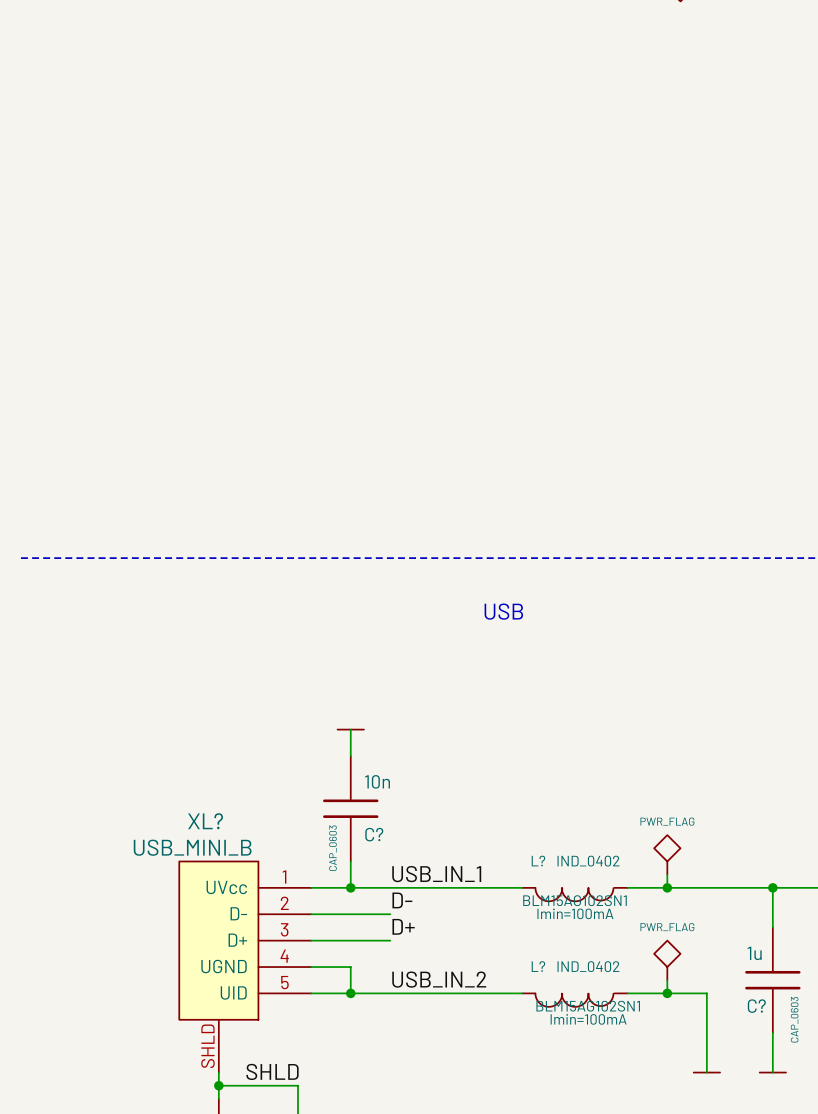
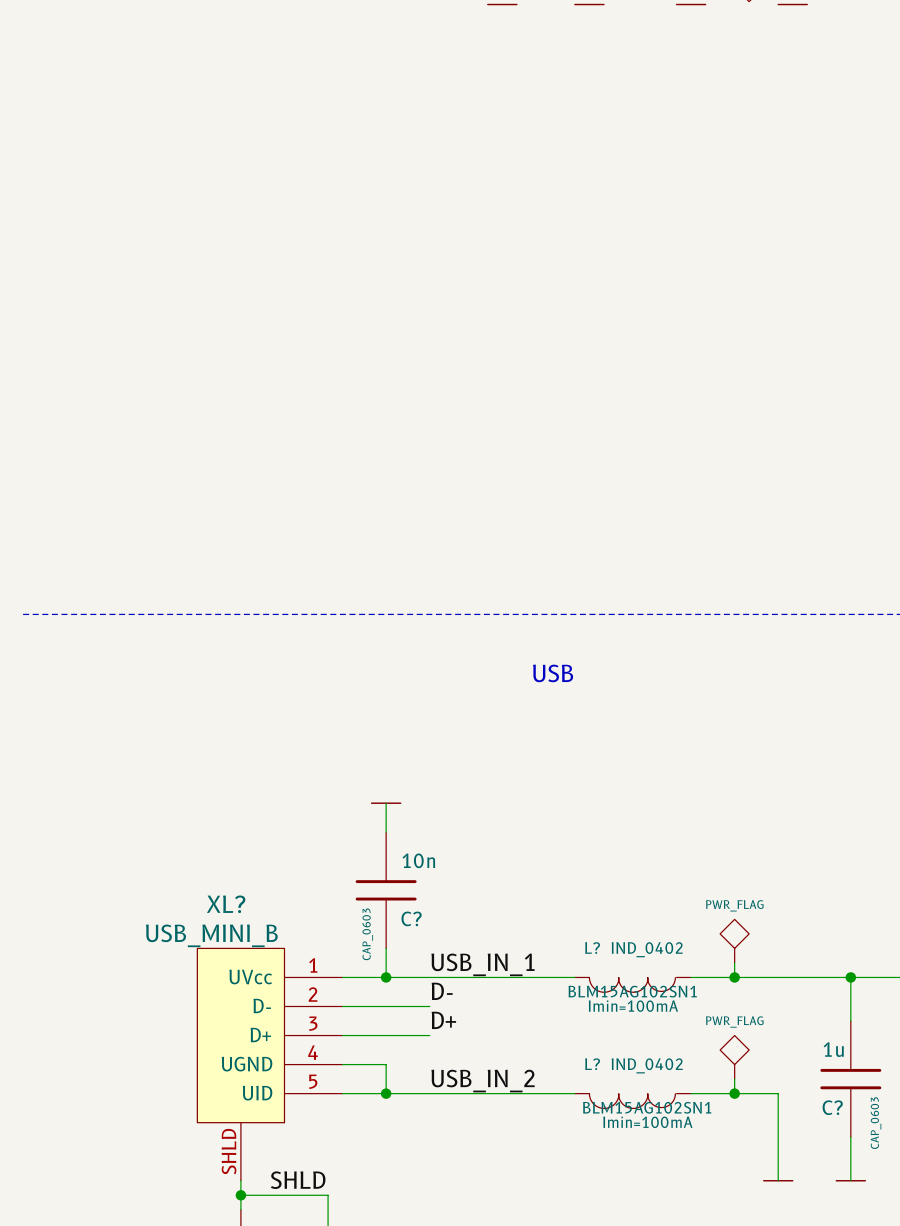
power symbol: none -> (502, 4)
power symbol: none -> (589, 4)
power symbol: none -> (691, 4)
power symbol: none -> (792, 4)

